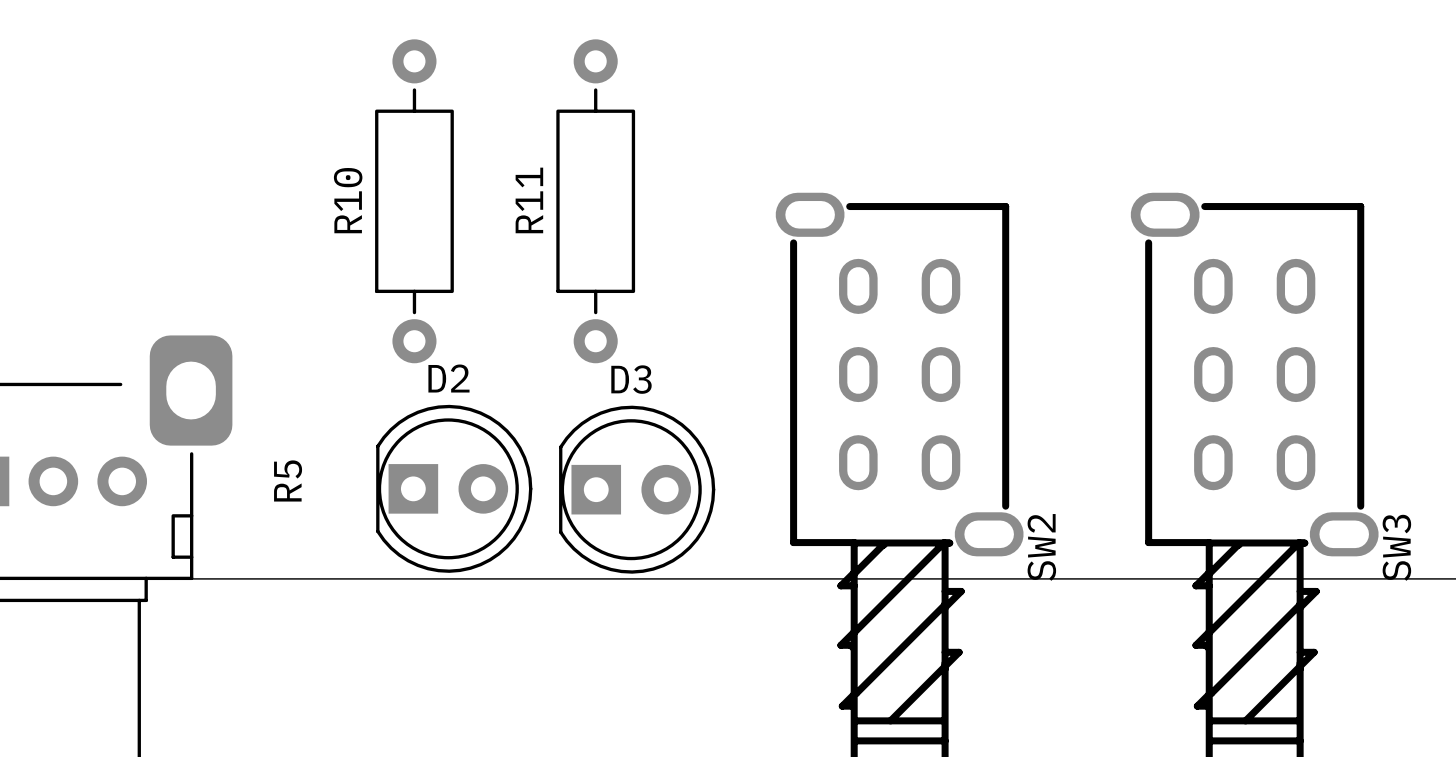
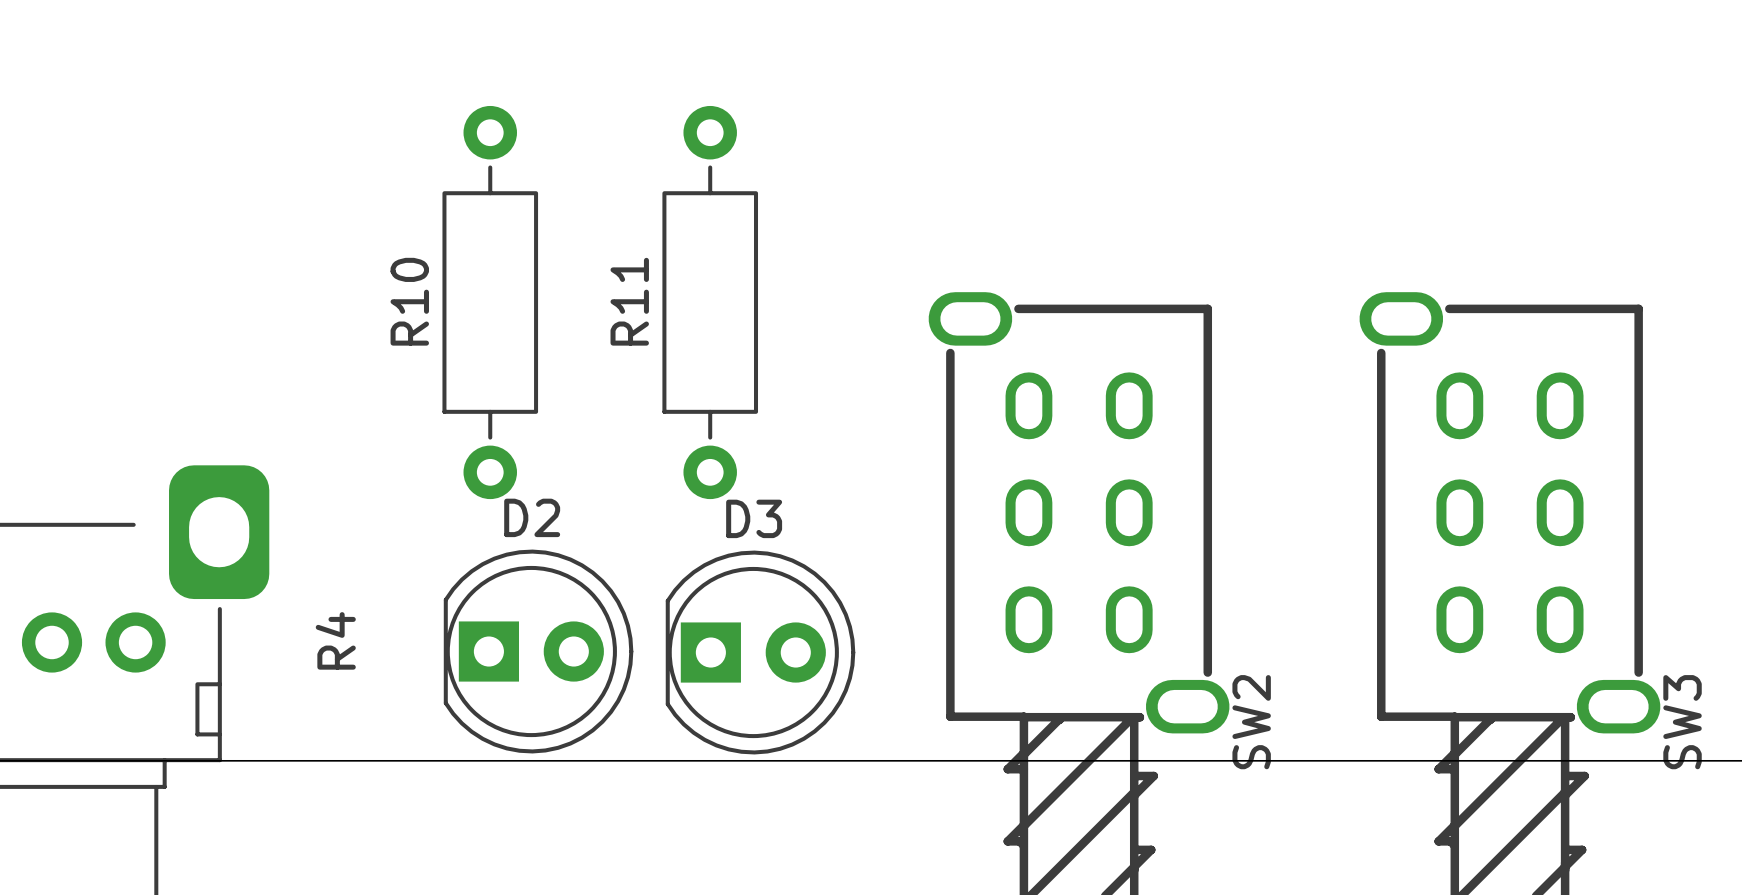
R5 name: R5 (288, 480) -> R4 (335, 640)

